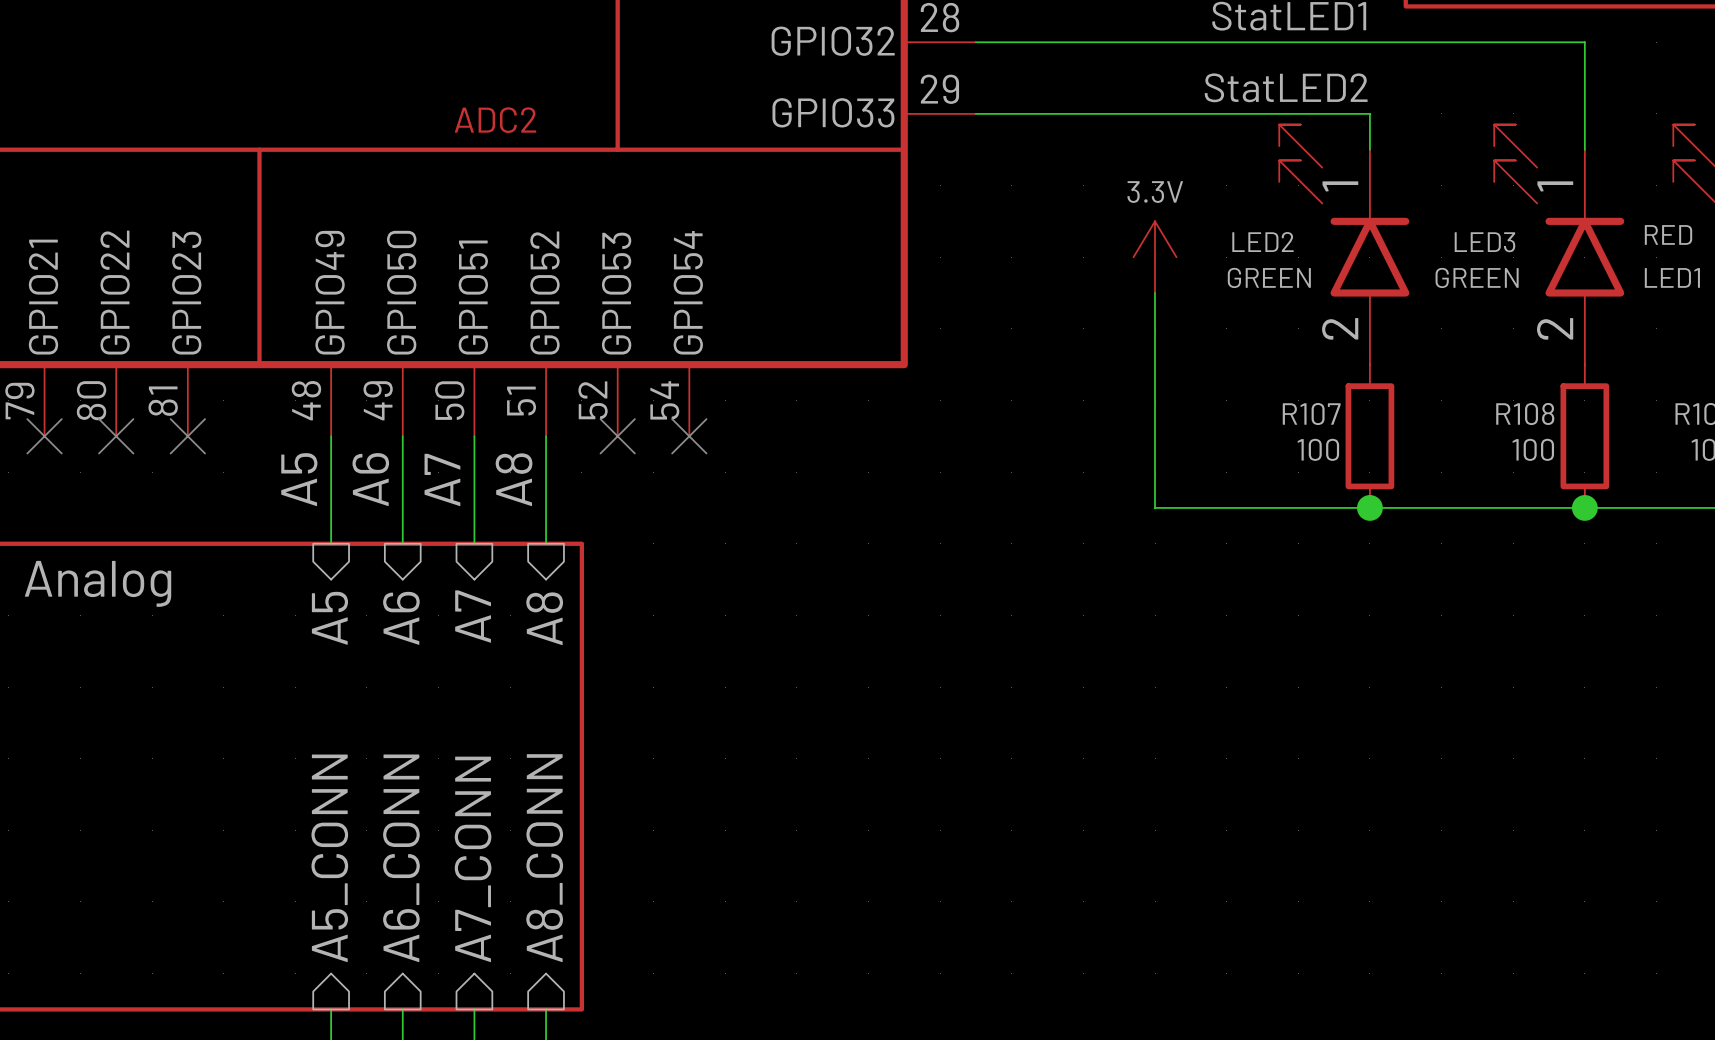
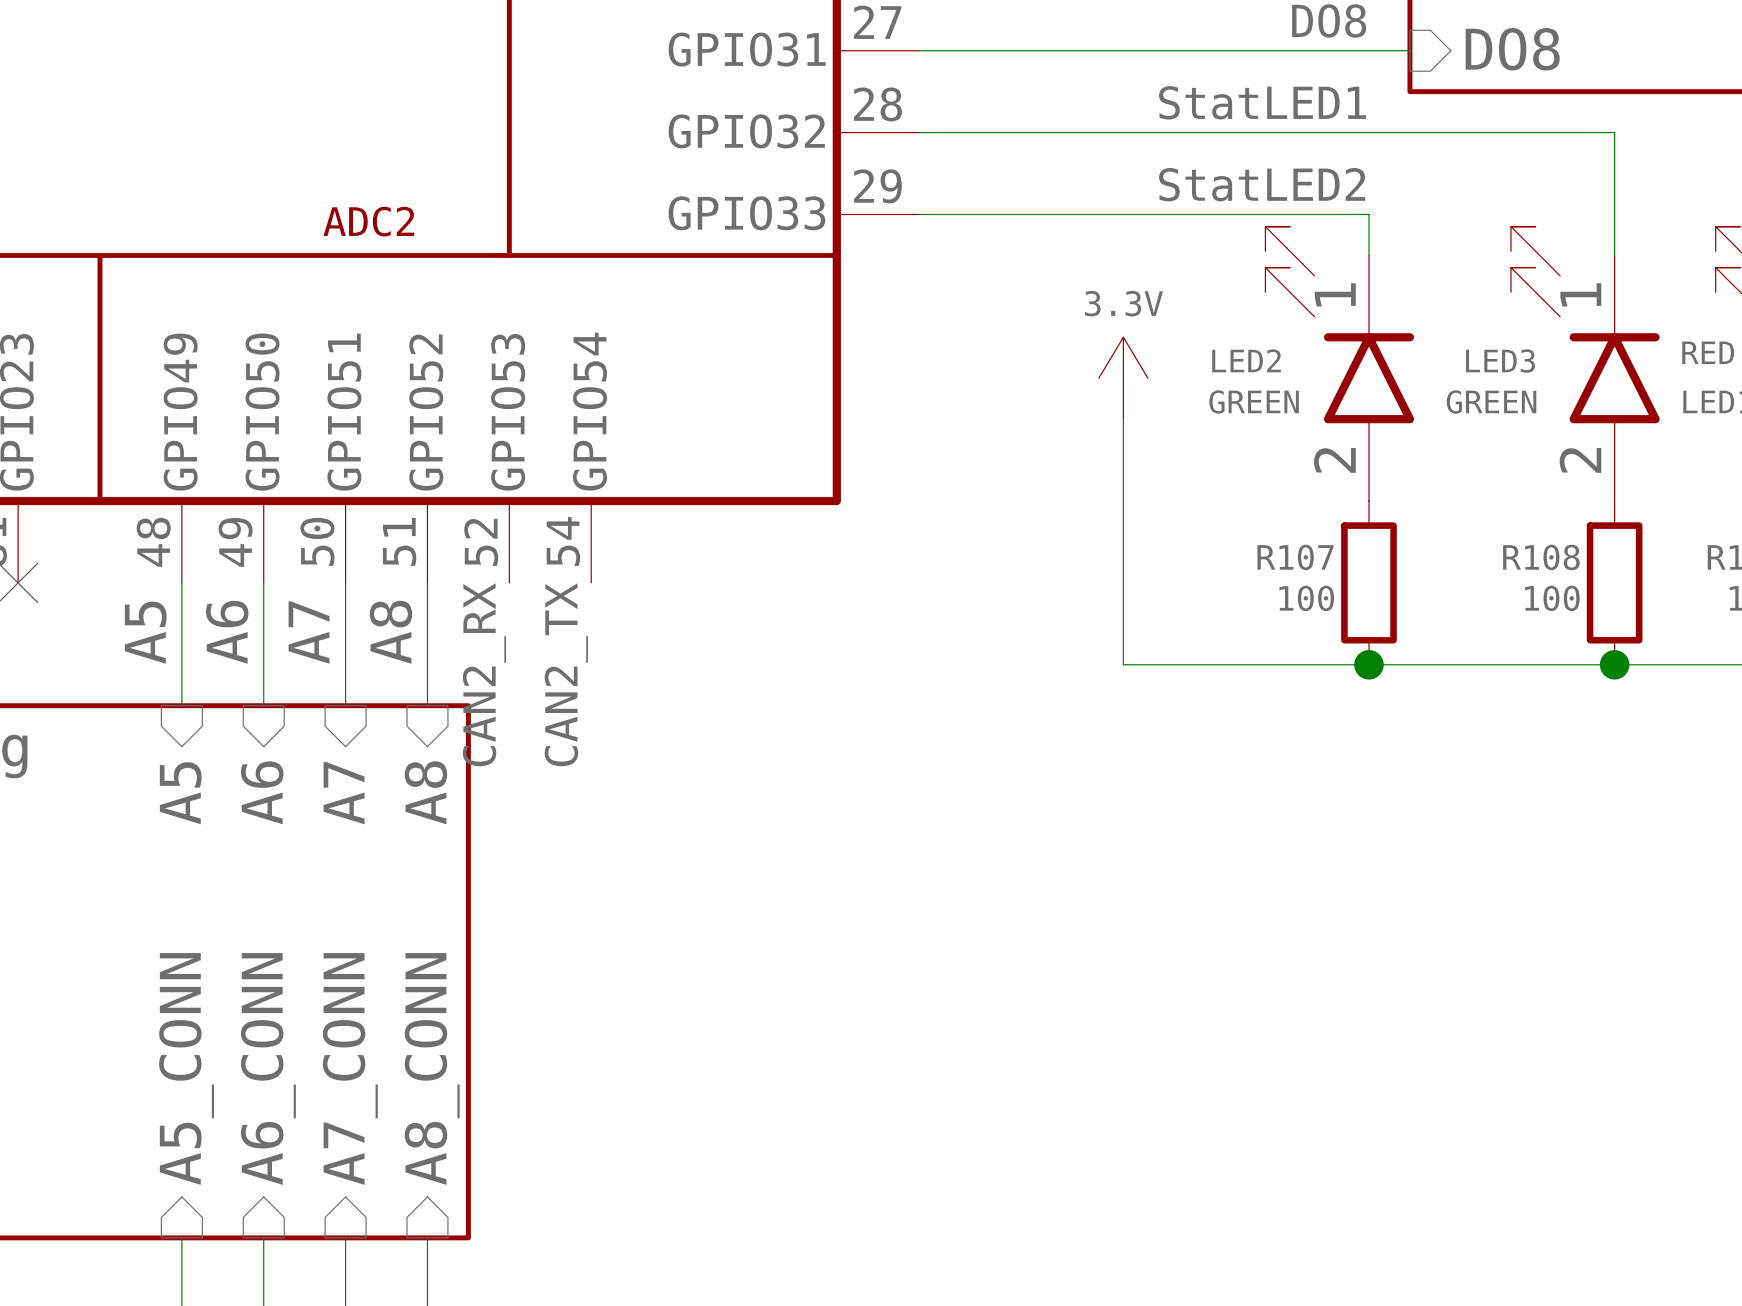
no-connect mark: (617, 436) -> none
no-connect mark: (689, 436) -> none
label: none -> CAN2_TX (566, 674)
label: none -> CAN2_RX (484, 674)

